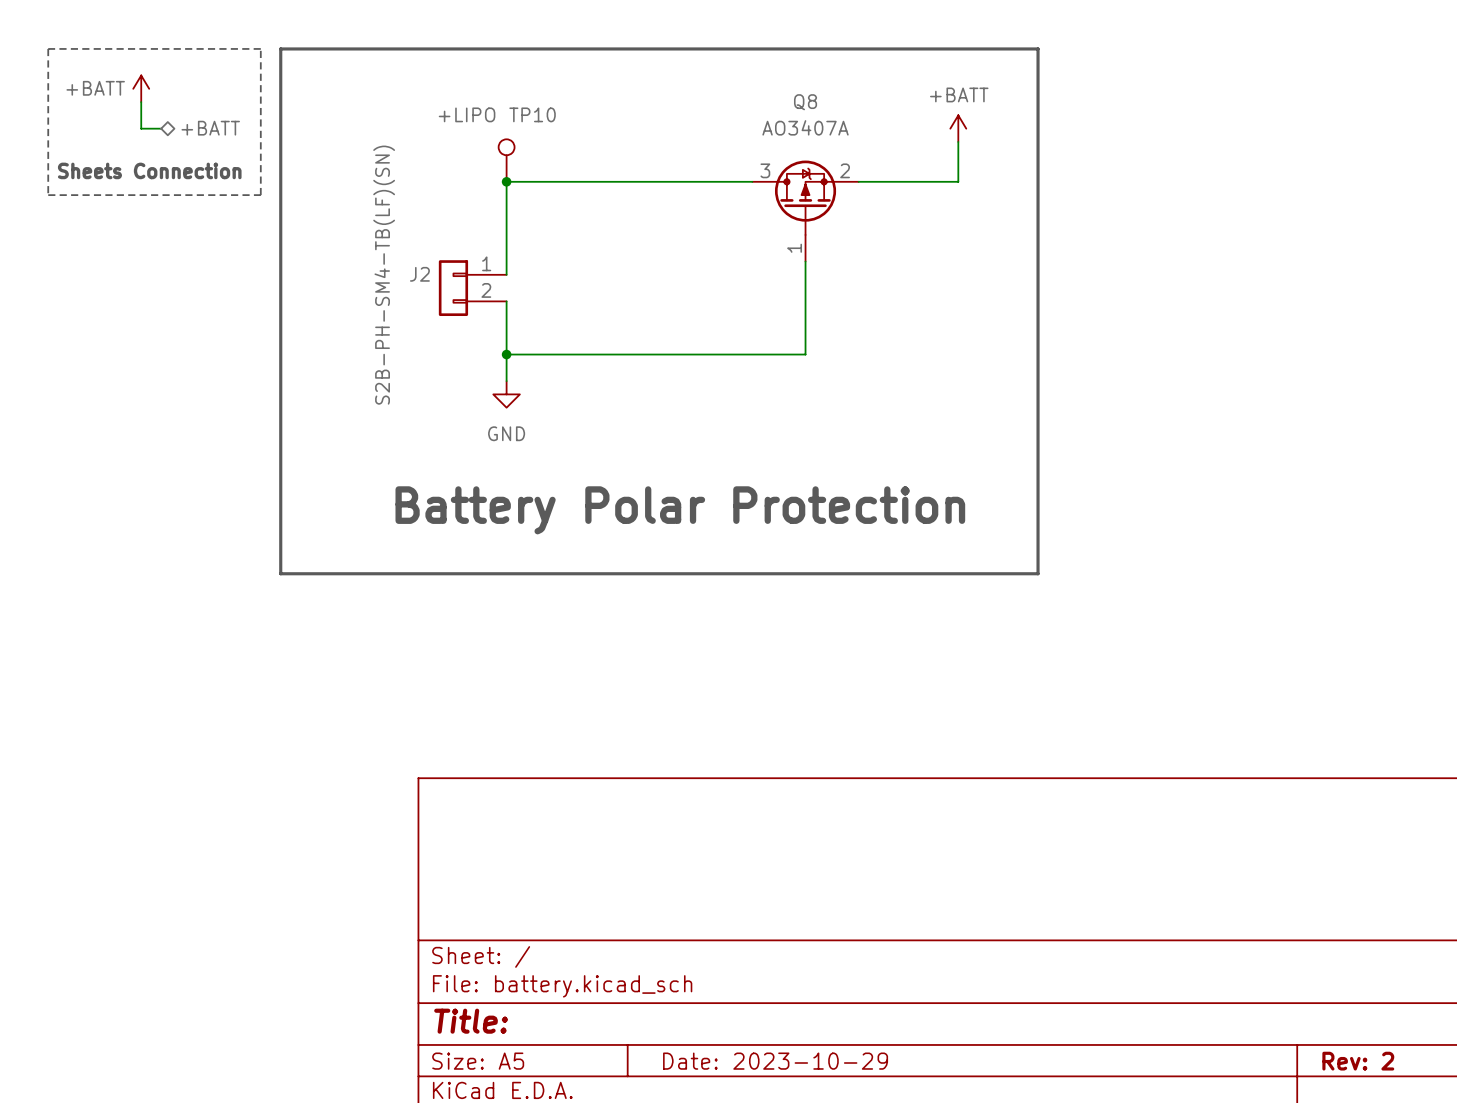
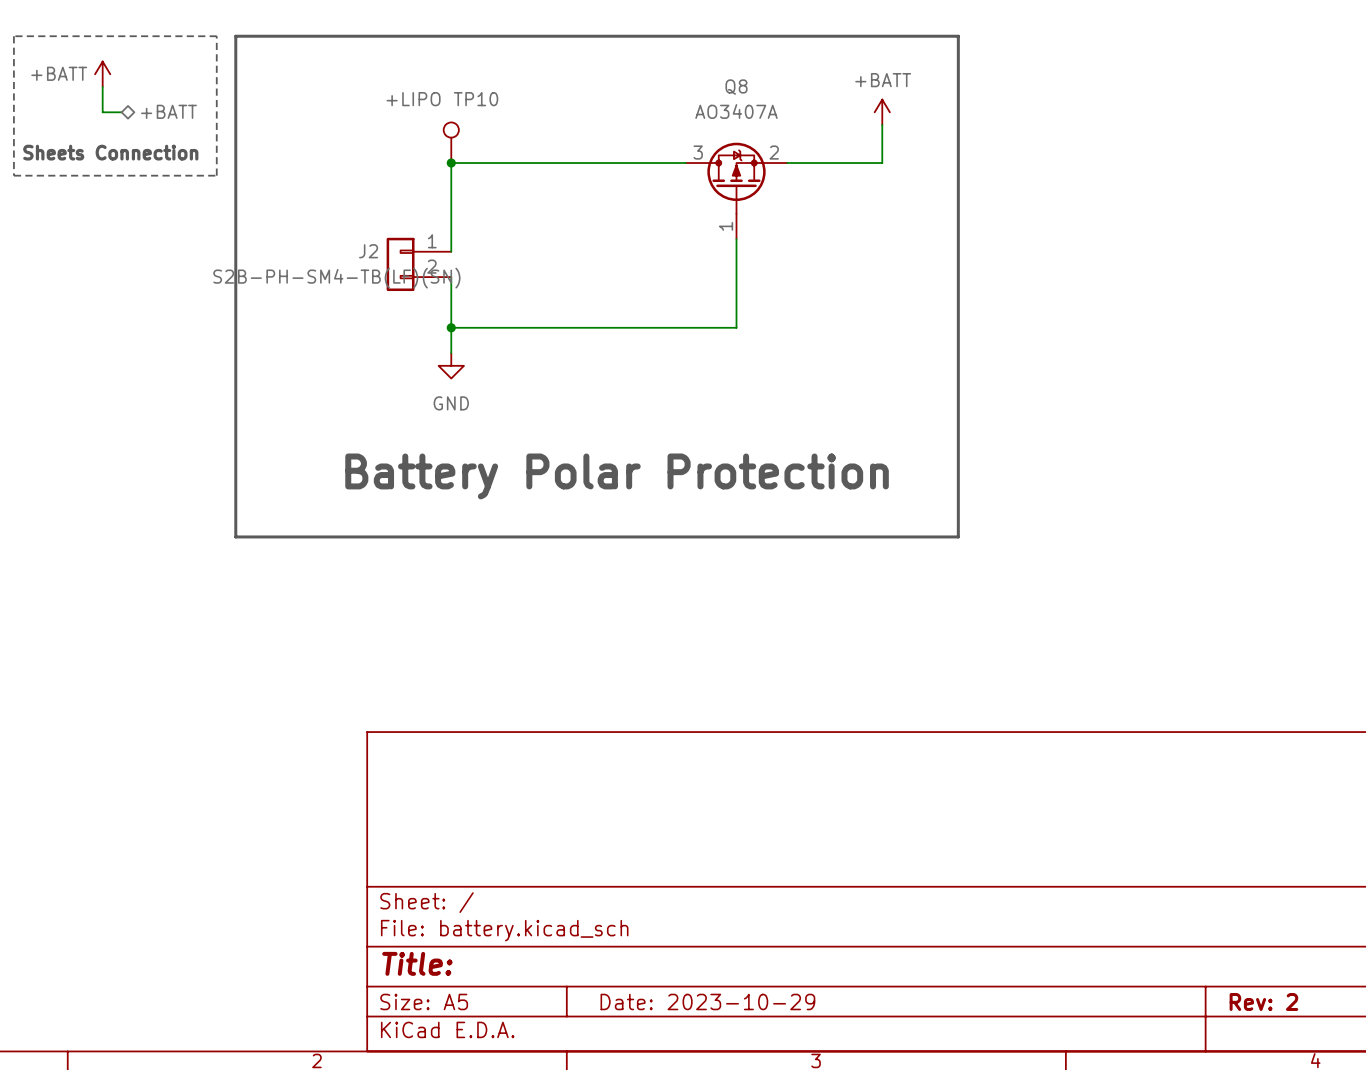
J2 value rotation: 0° (384, 275) -> 90° clockwise (336, 278)

